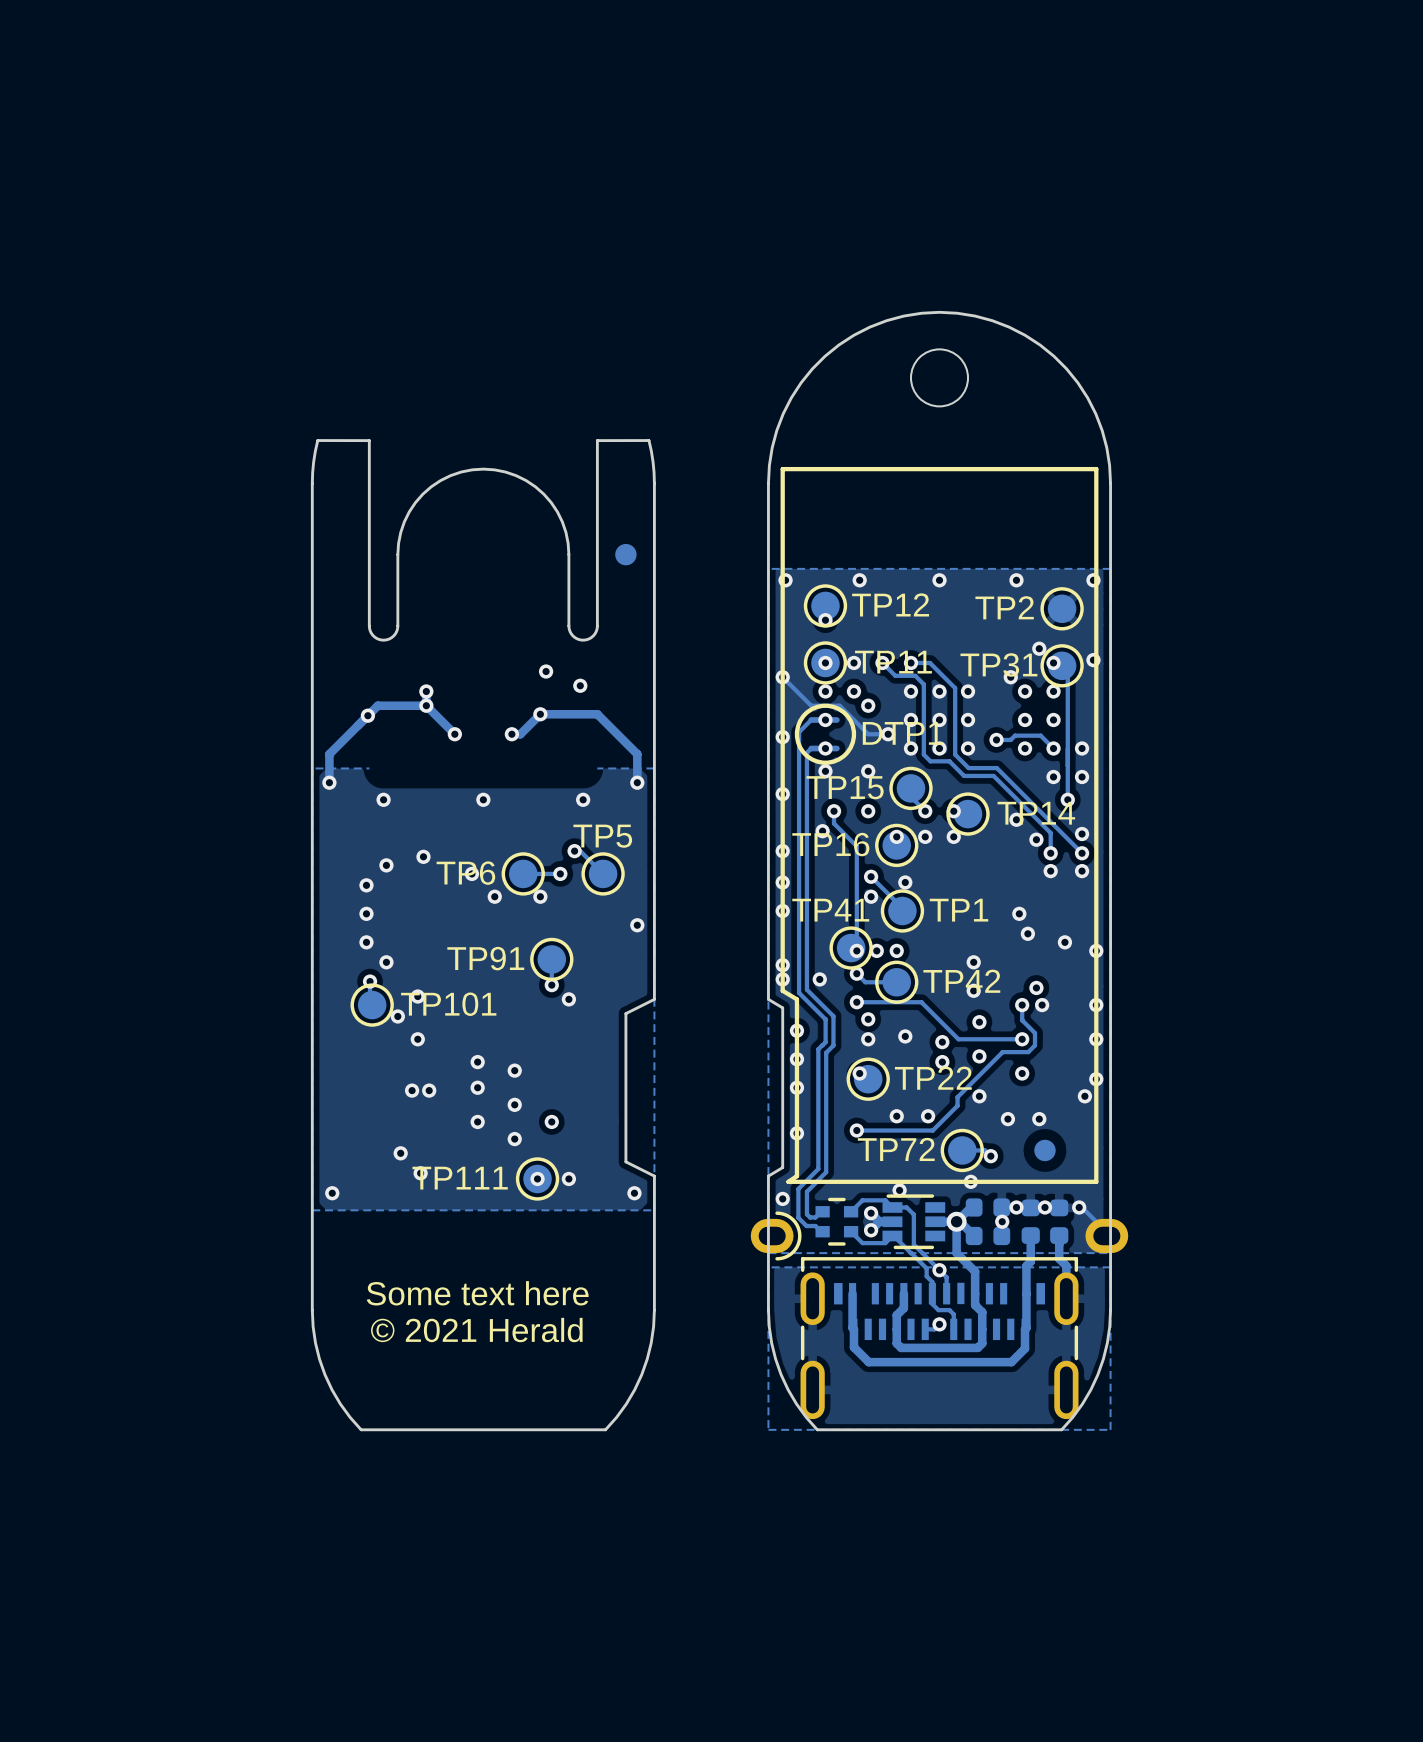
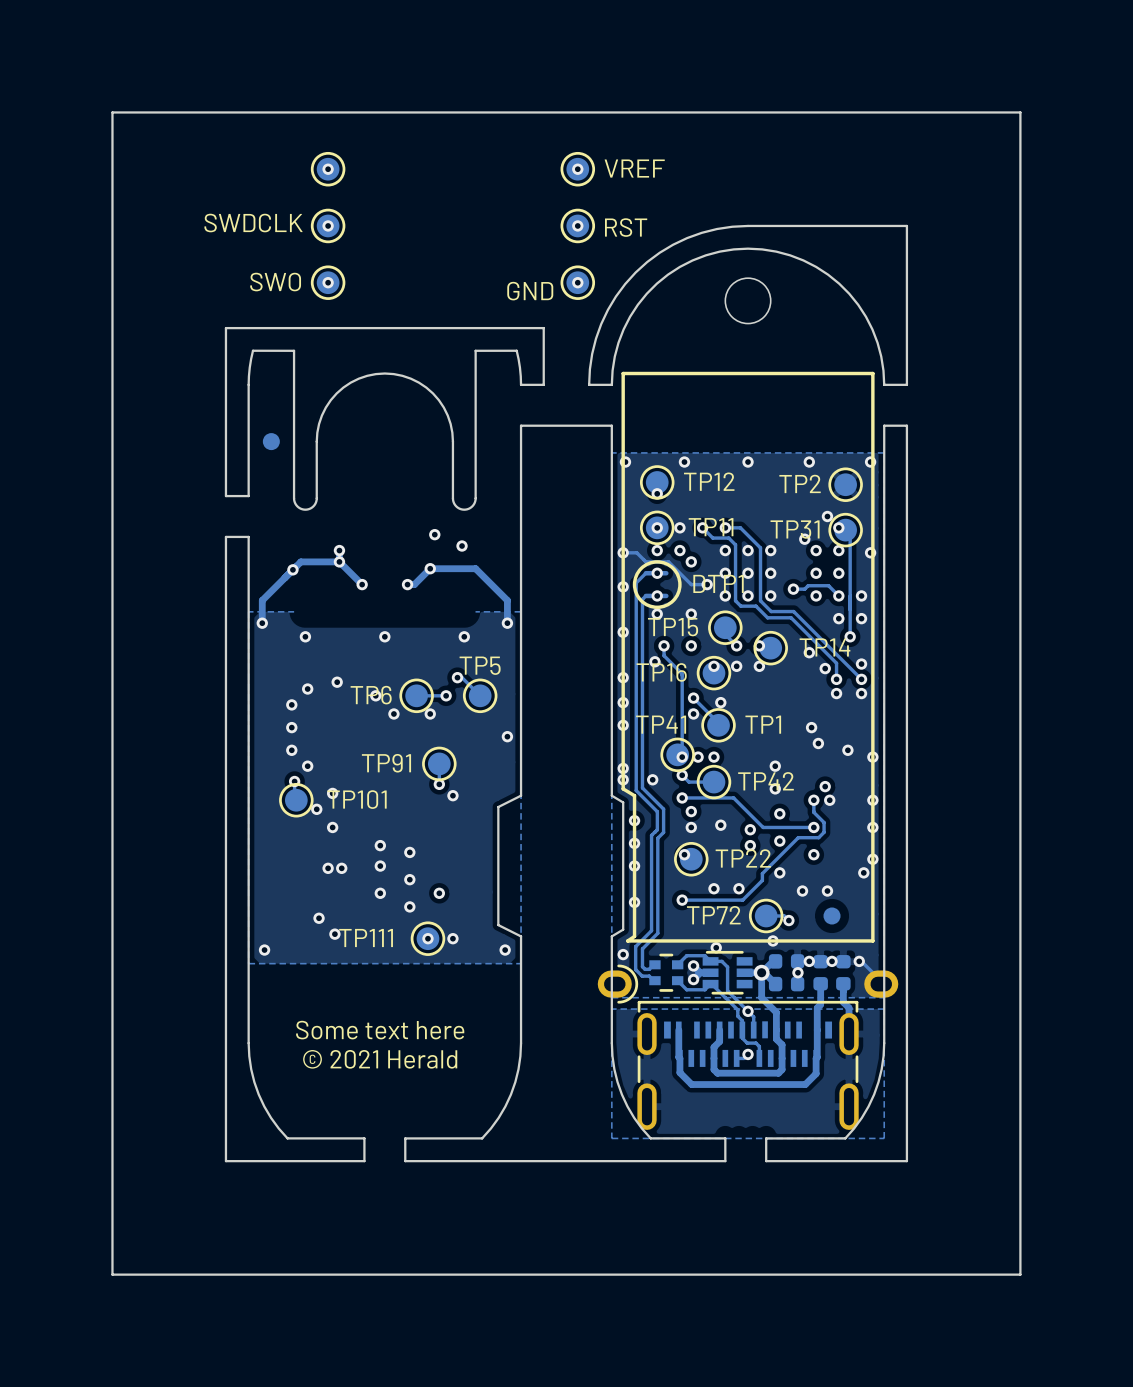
board edge: none -> (1020, 112) (1020, 1274) (112, 1274) (112, 112) (1020, 112)
text: none -> VREF (634, 168)
part: none -> (328, 169)
via: none -> (328, 169)
part: none -> (577, 169)
via: none -> (577, 169)
text: none -> SWDCLK (253, 223)
part: none -> (328, 225)
via: none -> (328, 225)
part: none -> (577, 225)
via: none -> (577, 225)
text: none -> RST (626, 227)
text: none -> SWO (275, 282)
part: none -> (328, 282)
via: none -> (328, 282)
part: none -> (577, 282)
via: none -> (577, 282)
text: none -> GND (530, 291)
board edge: (654, 483) (654, 534) -> (521, 384) (543, 384) (543, 328) (225, 328) (225, 496) (248, 496)
board edge: (768, 483) (768, 534) -> (521, 425) (611, 425)
board edge: (1110, 483) (1110, 534) -> (884, 384) (906, 384) (906, 225) (732, 226) (701, 232) (673, 244) (647, 262) (625, 284) (607, 309) (601, 324) (592, 353) (589, 384) (611, 384)
part position: (625, 554) -> (271, 441)
board edge: (312, 623) (312, 674) -> (364, 1138) (364, 1161) (225, 1161) (225, 536) (248, 536)
via position: (1093, 660) -> (870, 552)
track: (782, 677) (799, 694) -> (623, 552) (636, 552)
via position: (782, 677) -> (623, 552)
board edge: (605, 1429) (457, 1429) -> (482, 1138) (405, 1138) (405, 1161) (725, 1161) (725, 1138)
board edge: (1061, 1429) (910, 1429) -> (845, 1138) (766, 1138) (766, 1161) (906, 1161) (906, 425) (884, 425)

